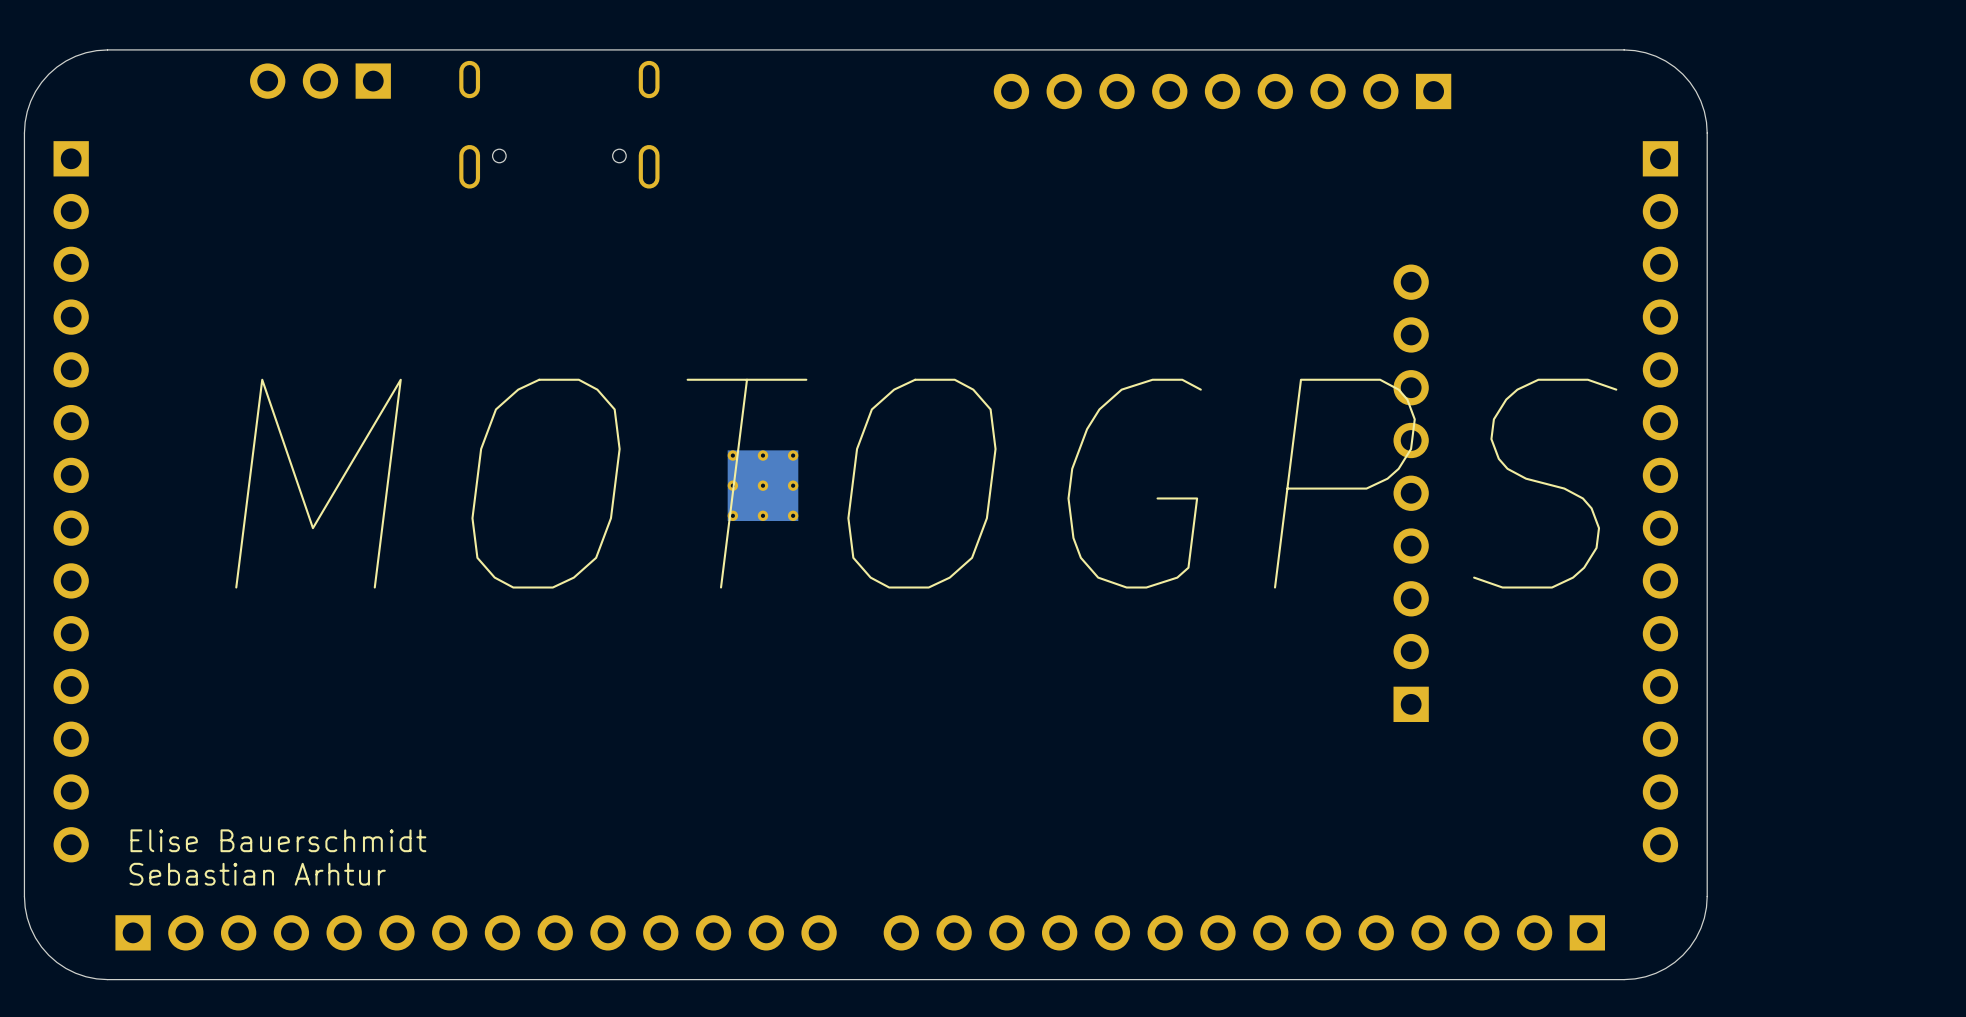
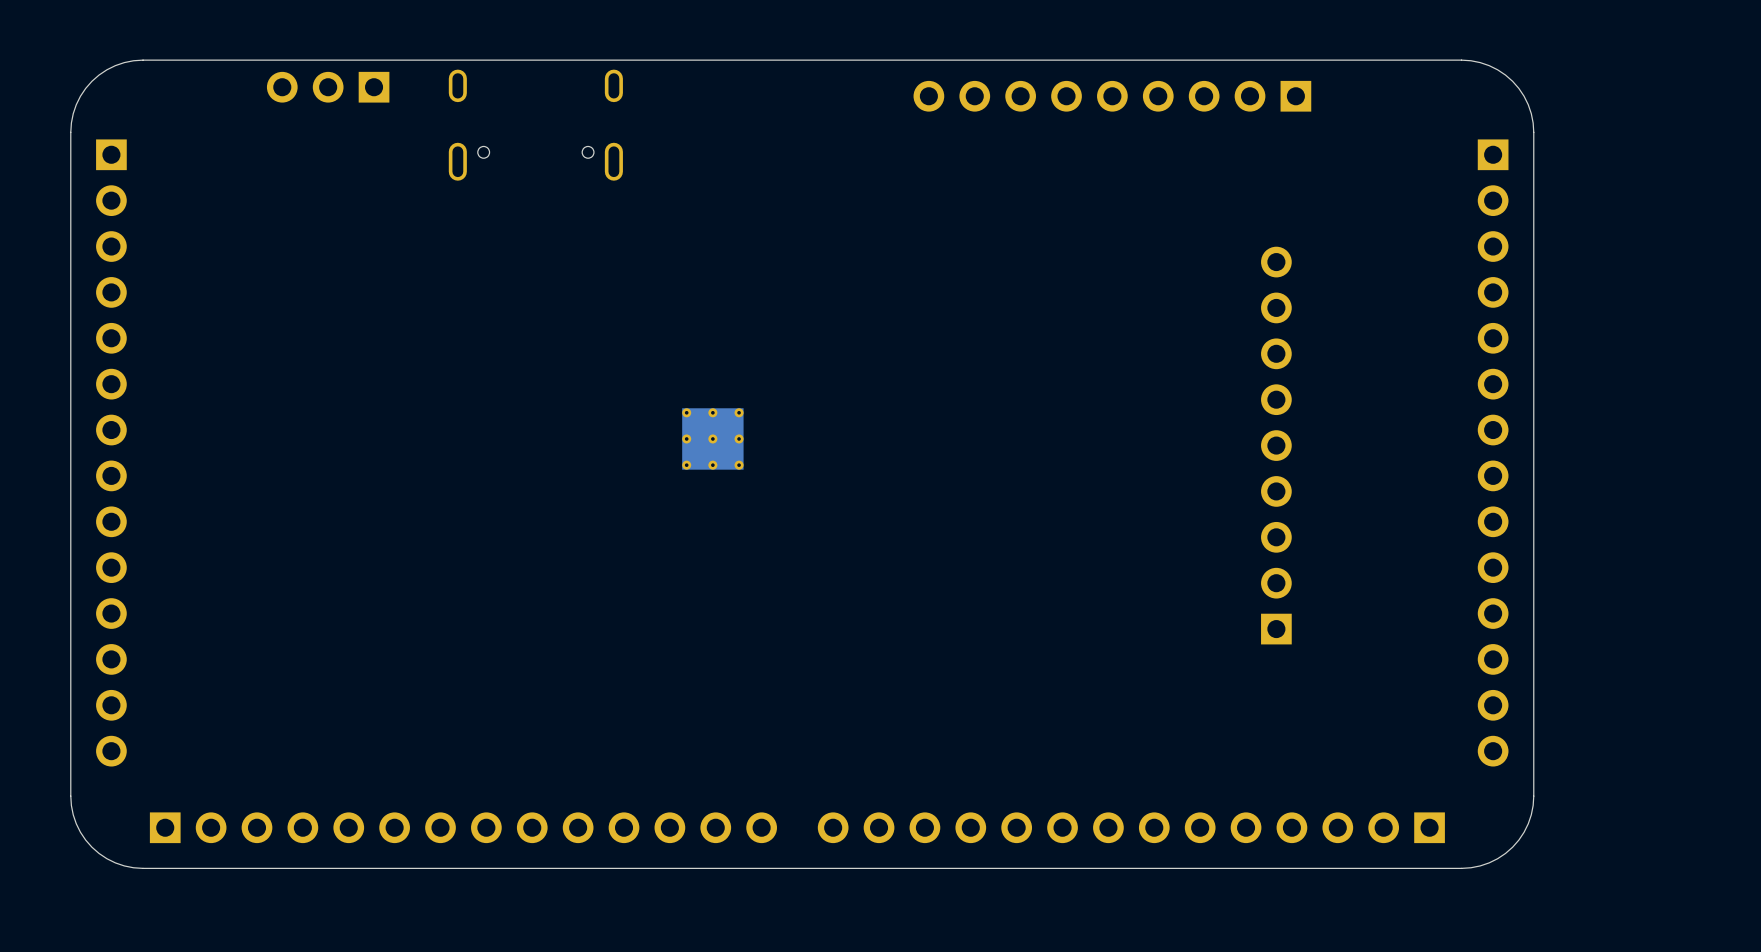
text: MOTOGPS (926, 483) -> none
text: Elise Bauerschmidt (278, 840) -> none
text: Sebastian Arhtur (257, 874) -> none

